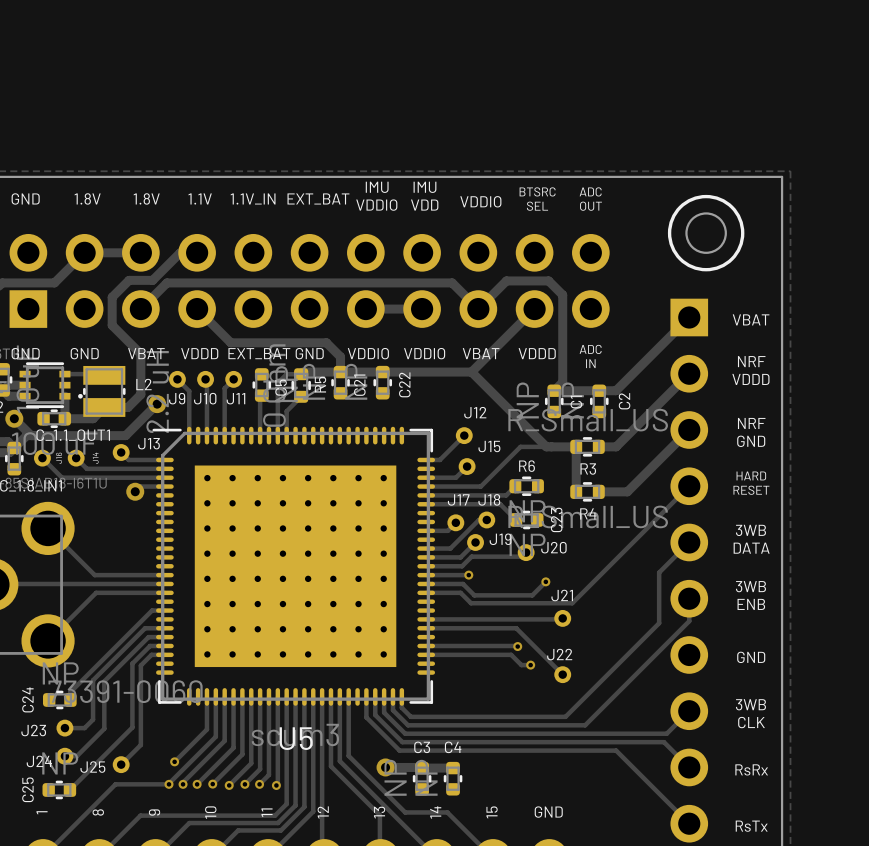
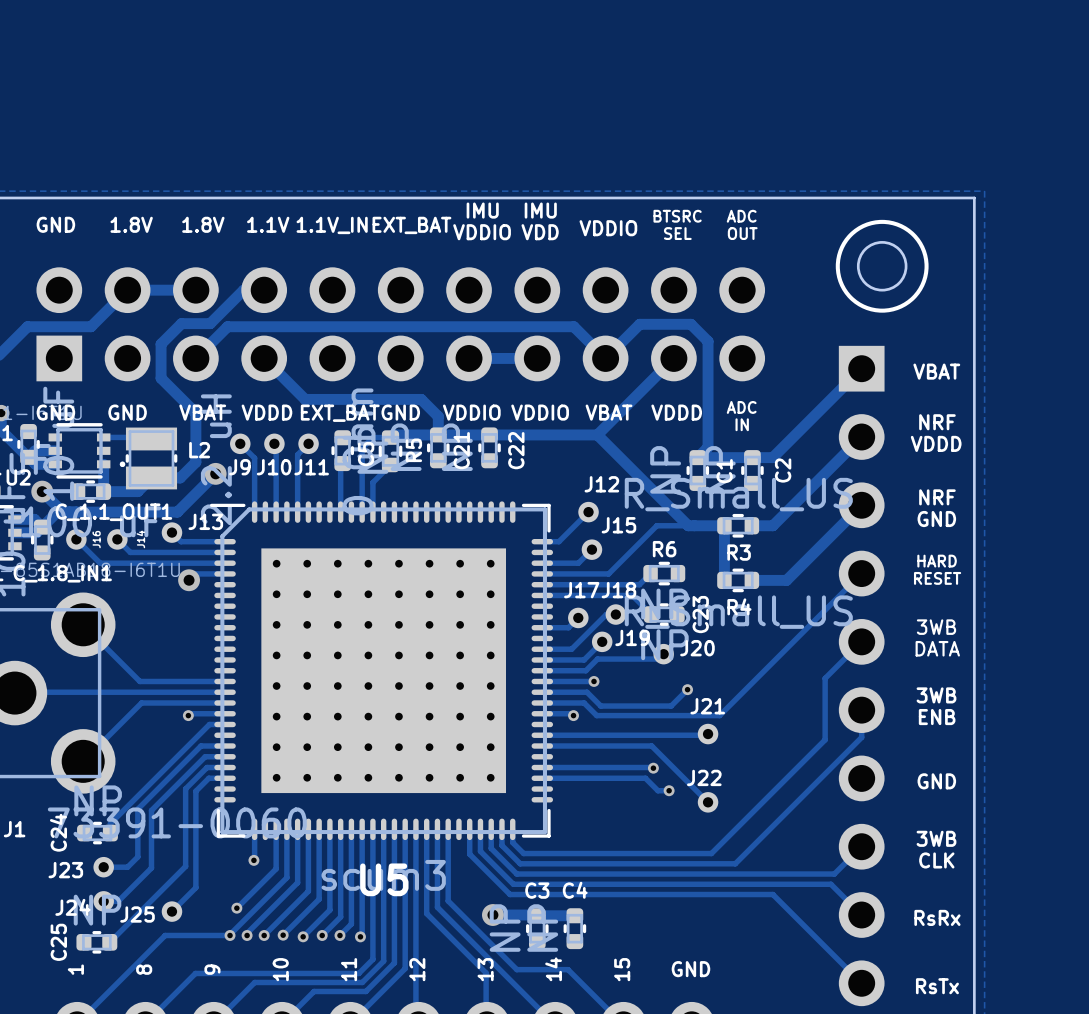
track: none -> (225, 713) (190, 713) (188, 715)
track: none -> (542, 713) (571, 713) (573, 715)
via: none -> (188, 715)
via: none -> (573, 715)
track: none -> (254, 829) (253, 860)
via: none -> (253, 860)

